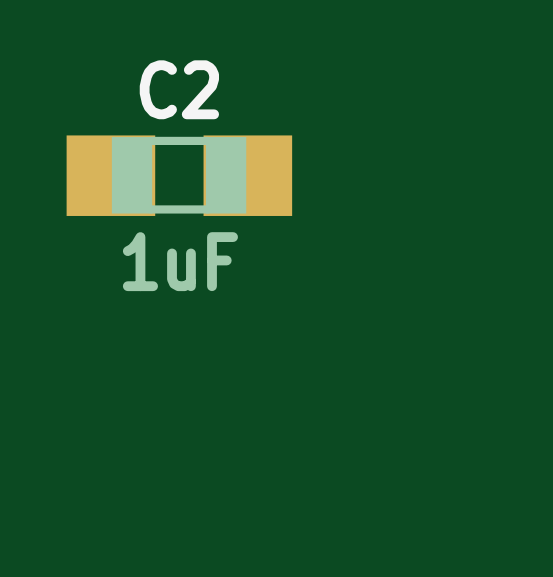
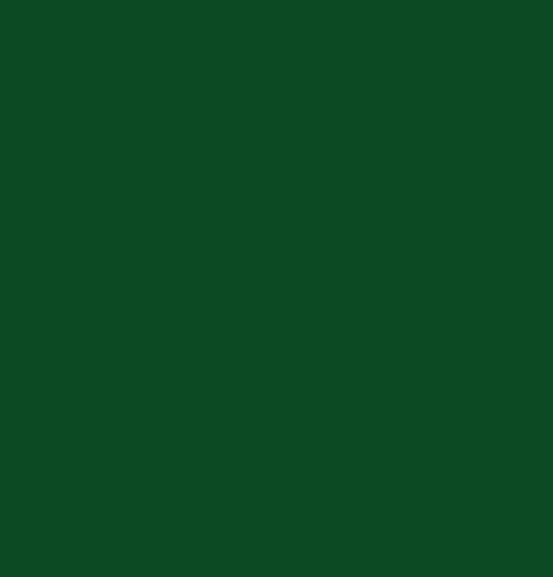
C2: 1uF (179, 175) -> none

